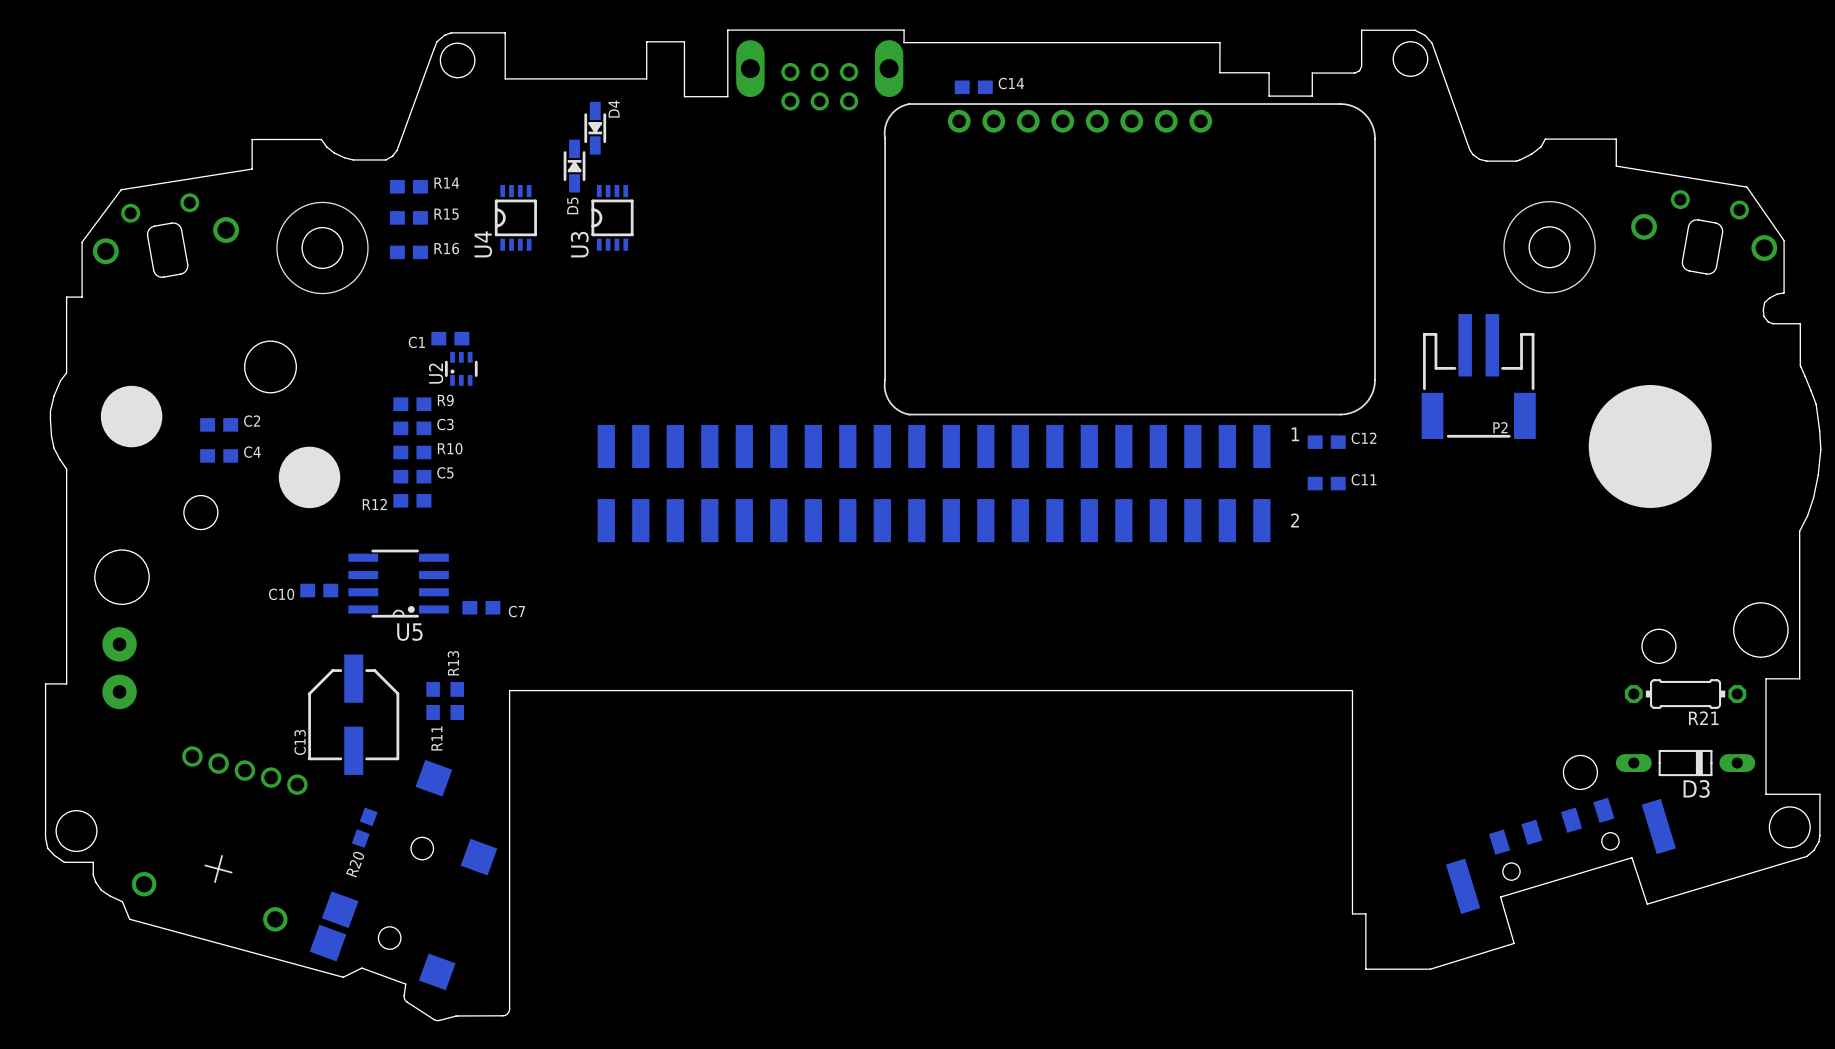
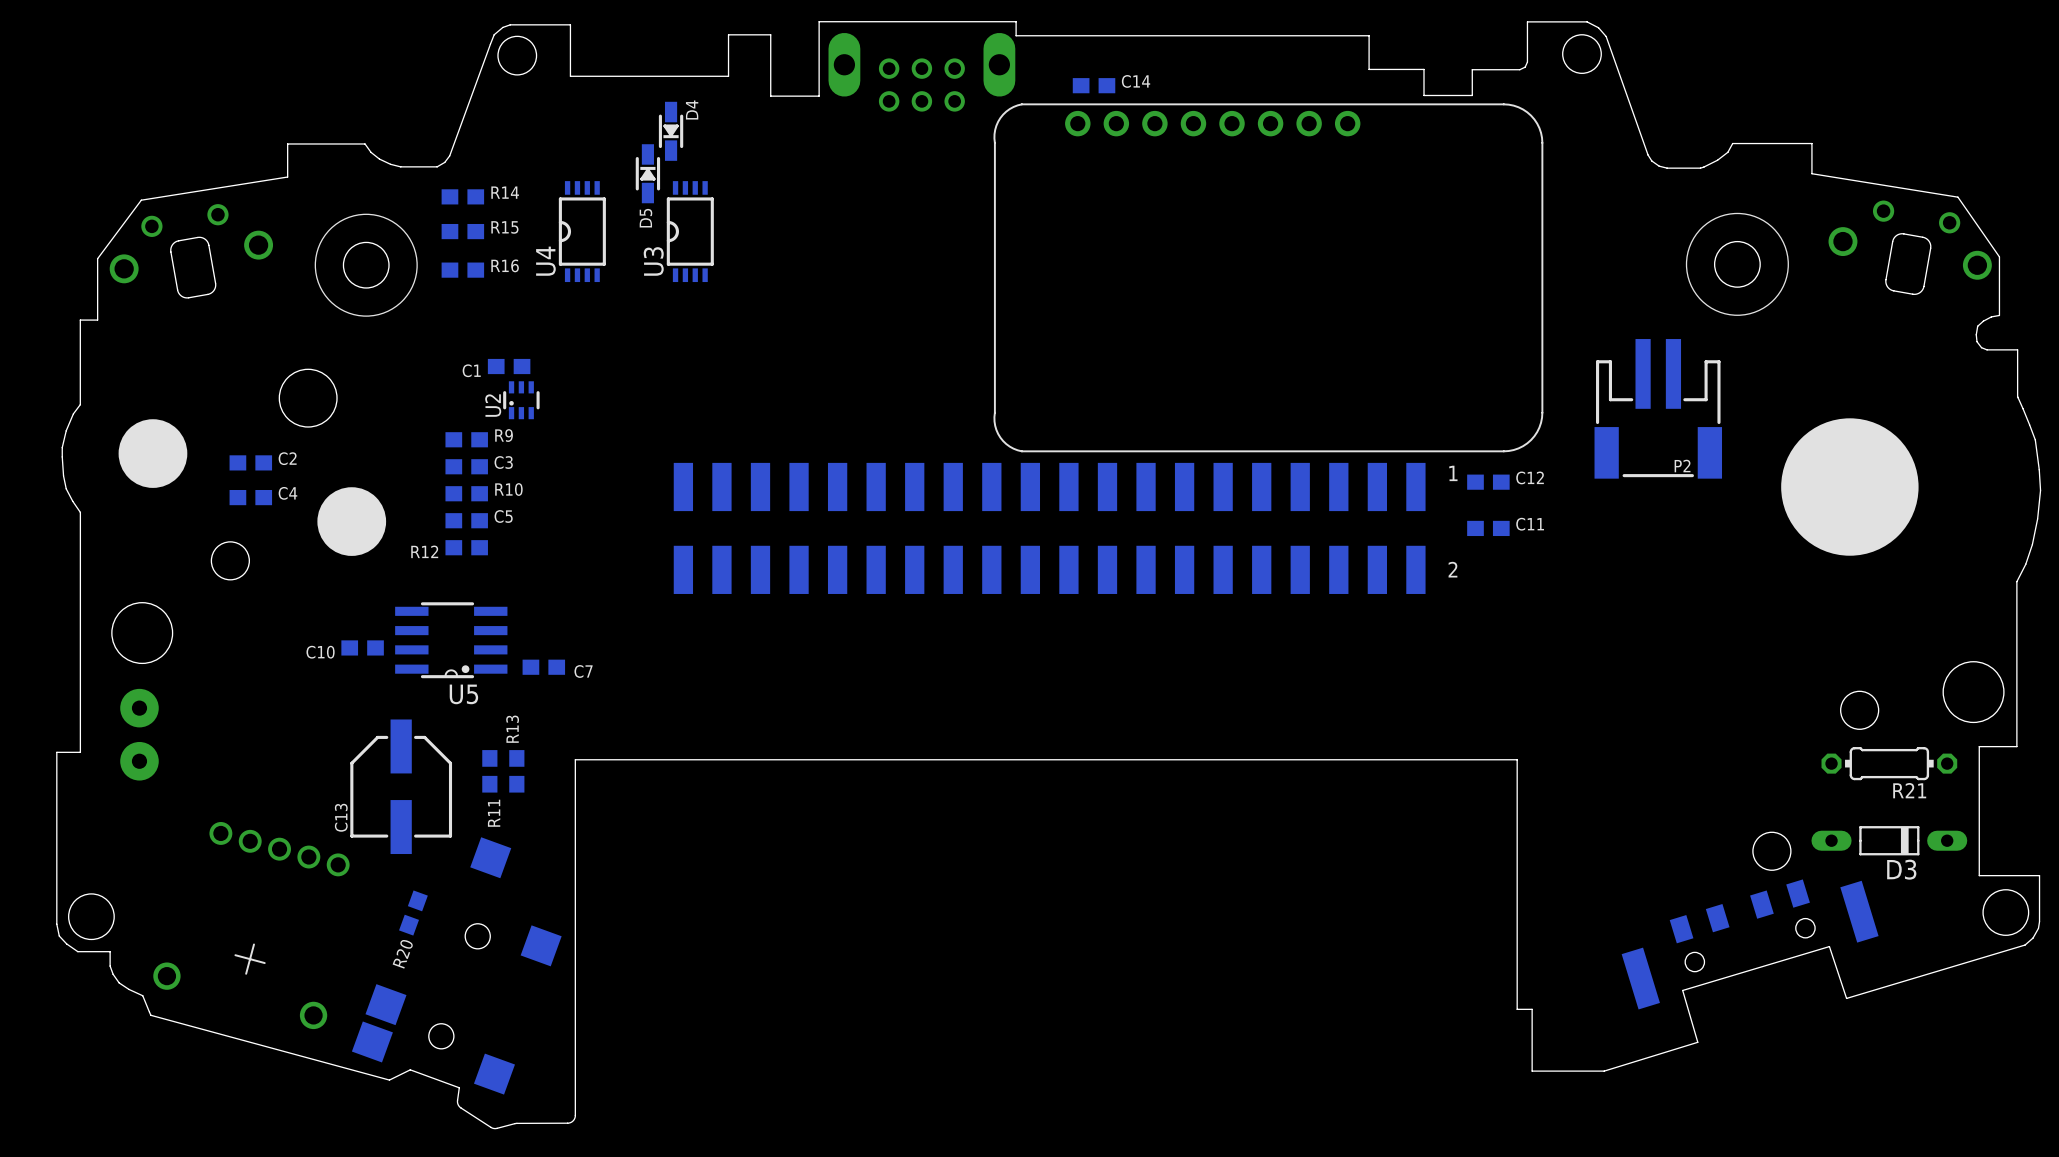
U4 footprint: [494, 184, 537, 251] -> [558, 181, 606, 283]
U3 footprint: [591, 184, 634, 251] -> [666, 181, 714, 283]

